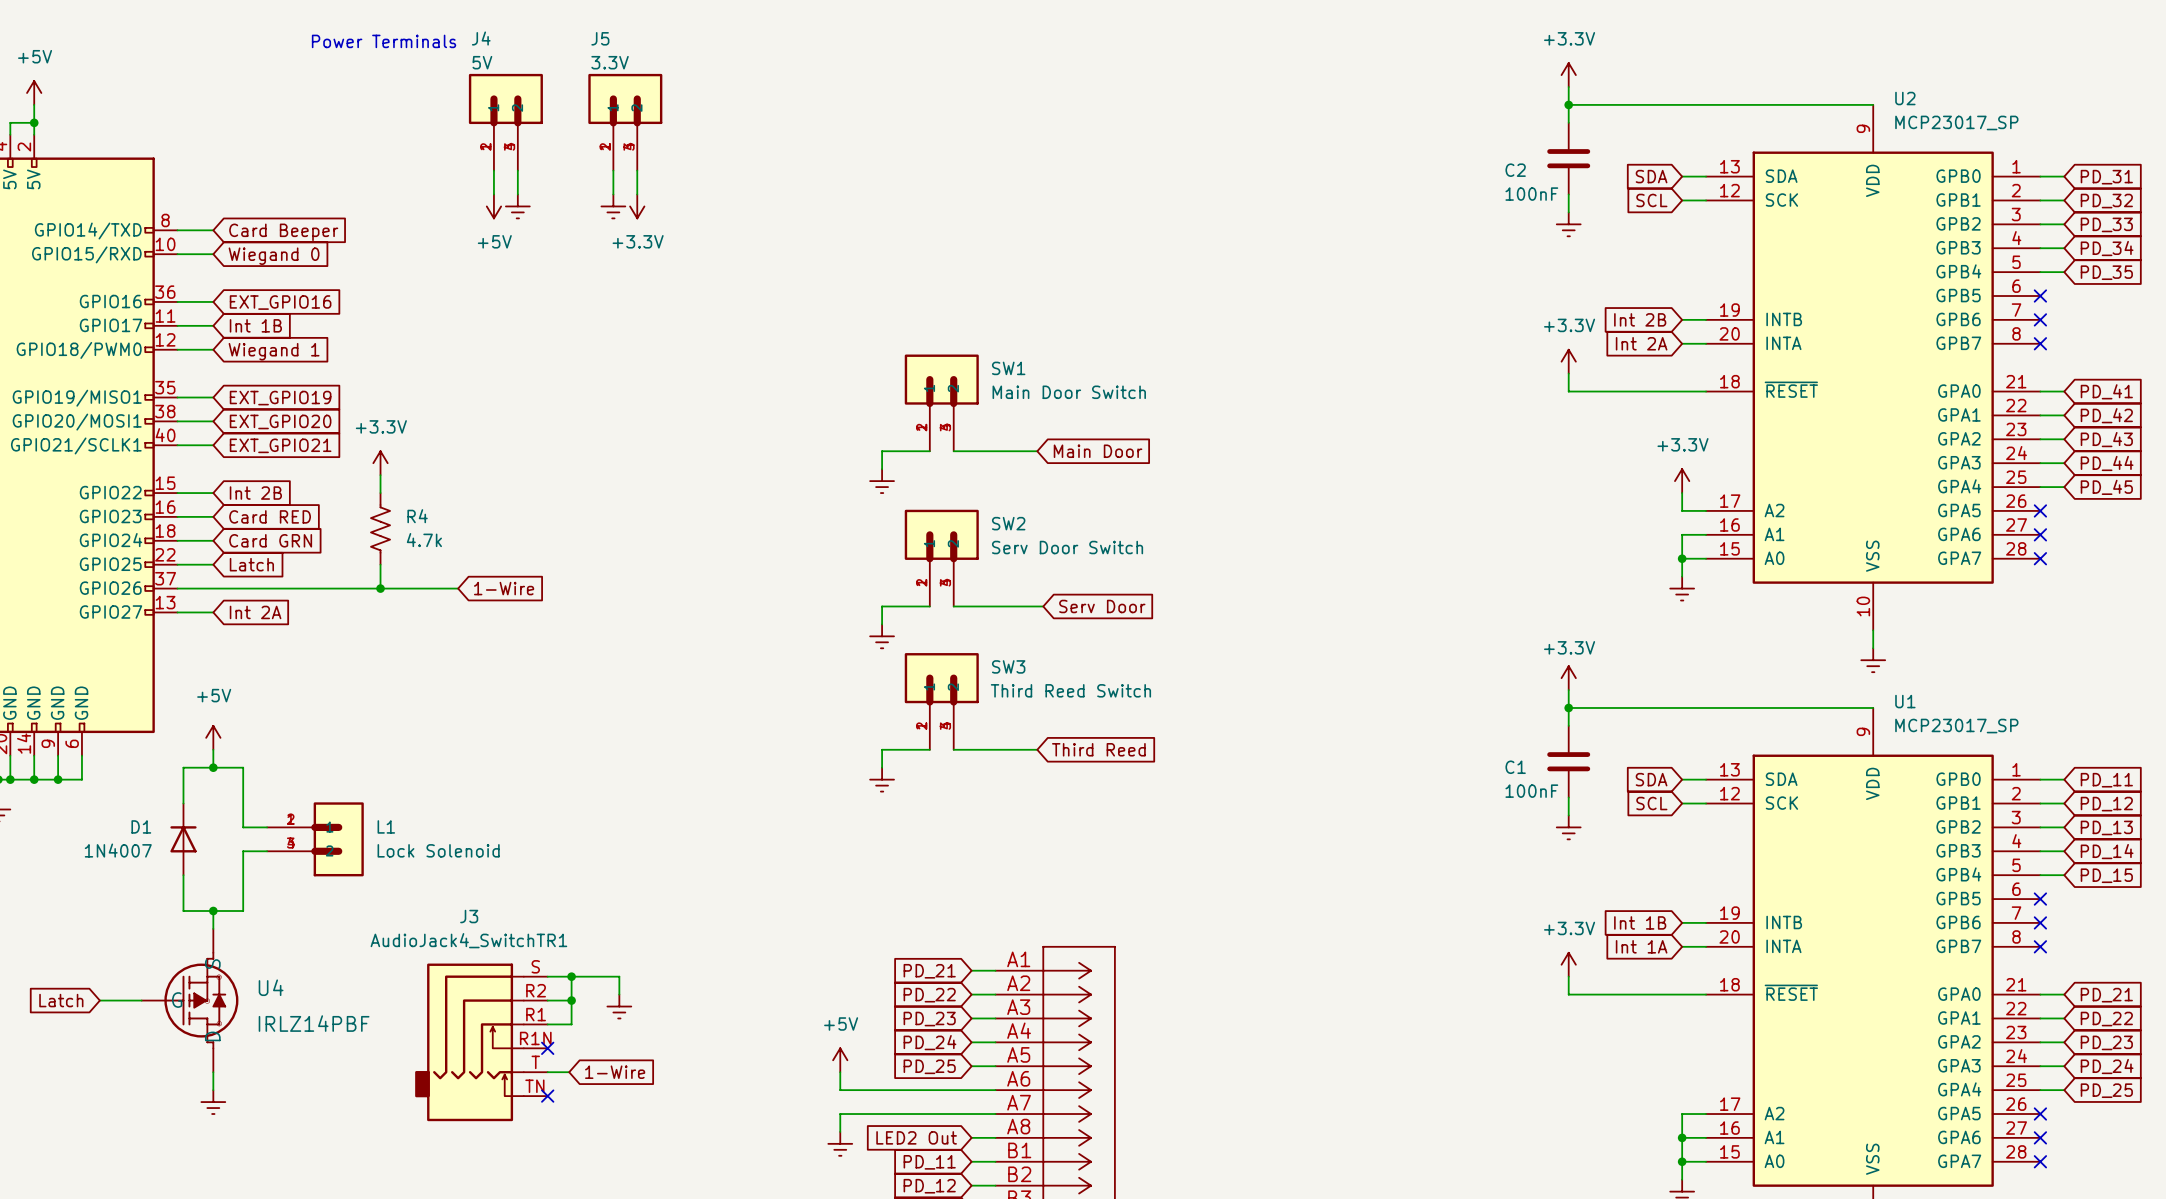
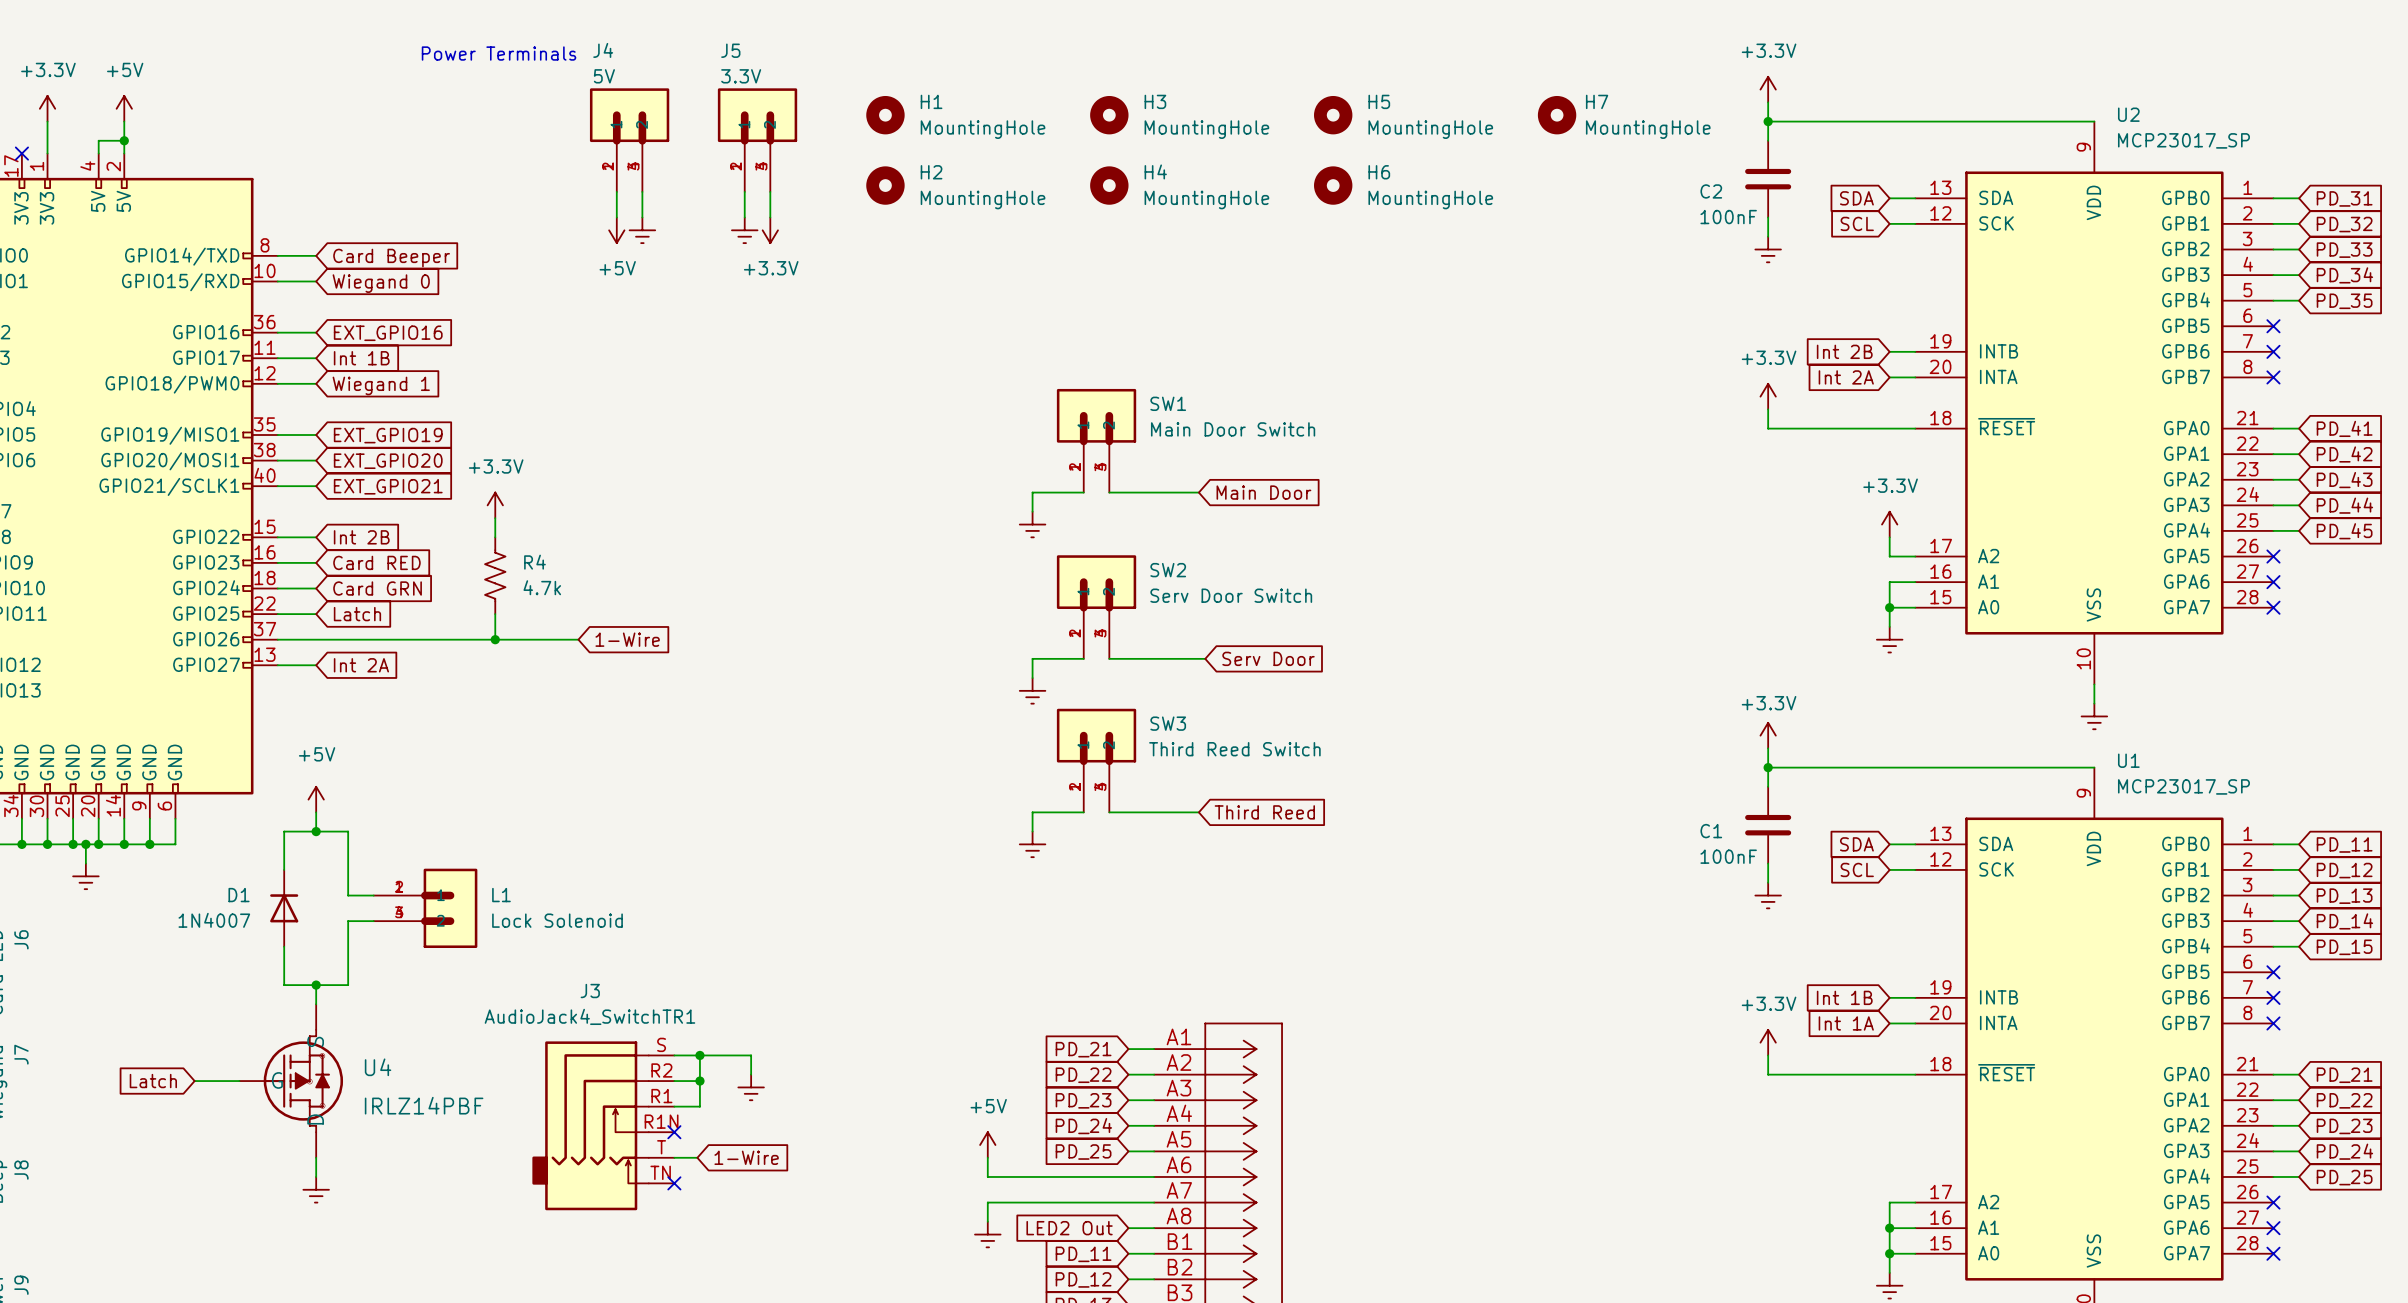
H1: none -> MountingHole (885, 115)
H3: none -> MountingHole (1109, 115)
H5: none -> MountingHole (1333, 115)
H7: none -> MountingHole (1557, 115)
H2: none -> MountingHole (885, 185)
H4: none -> MountingHole (1109, 185)
H6: none -> MountingHole (1333, 185)

